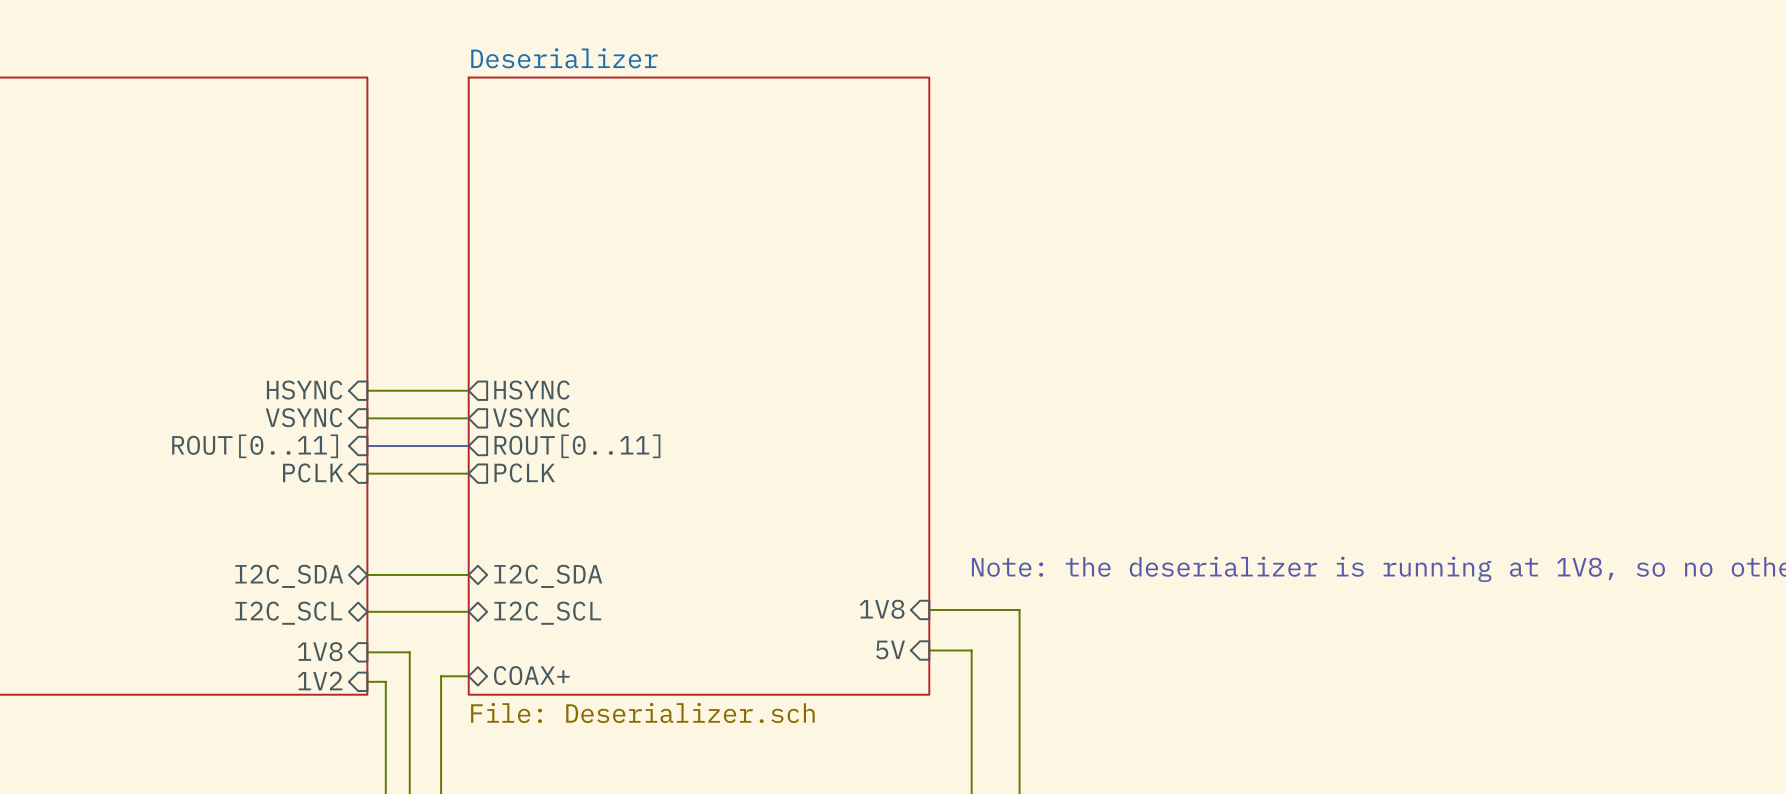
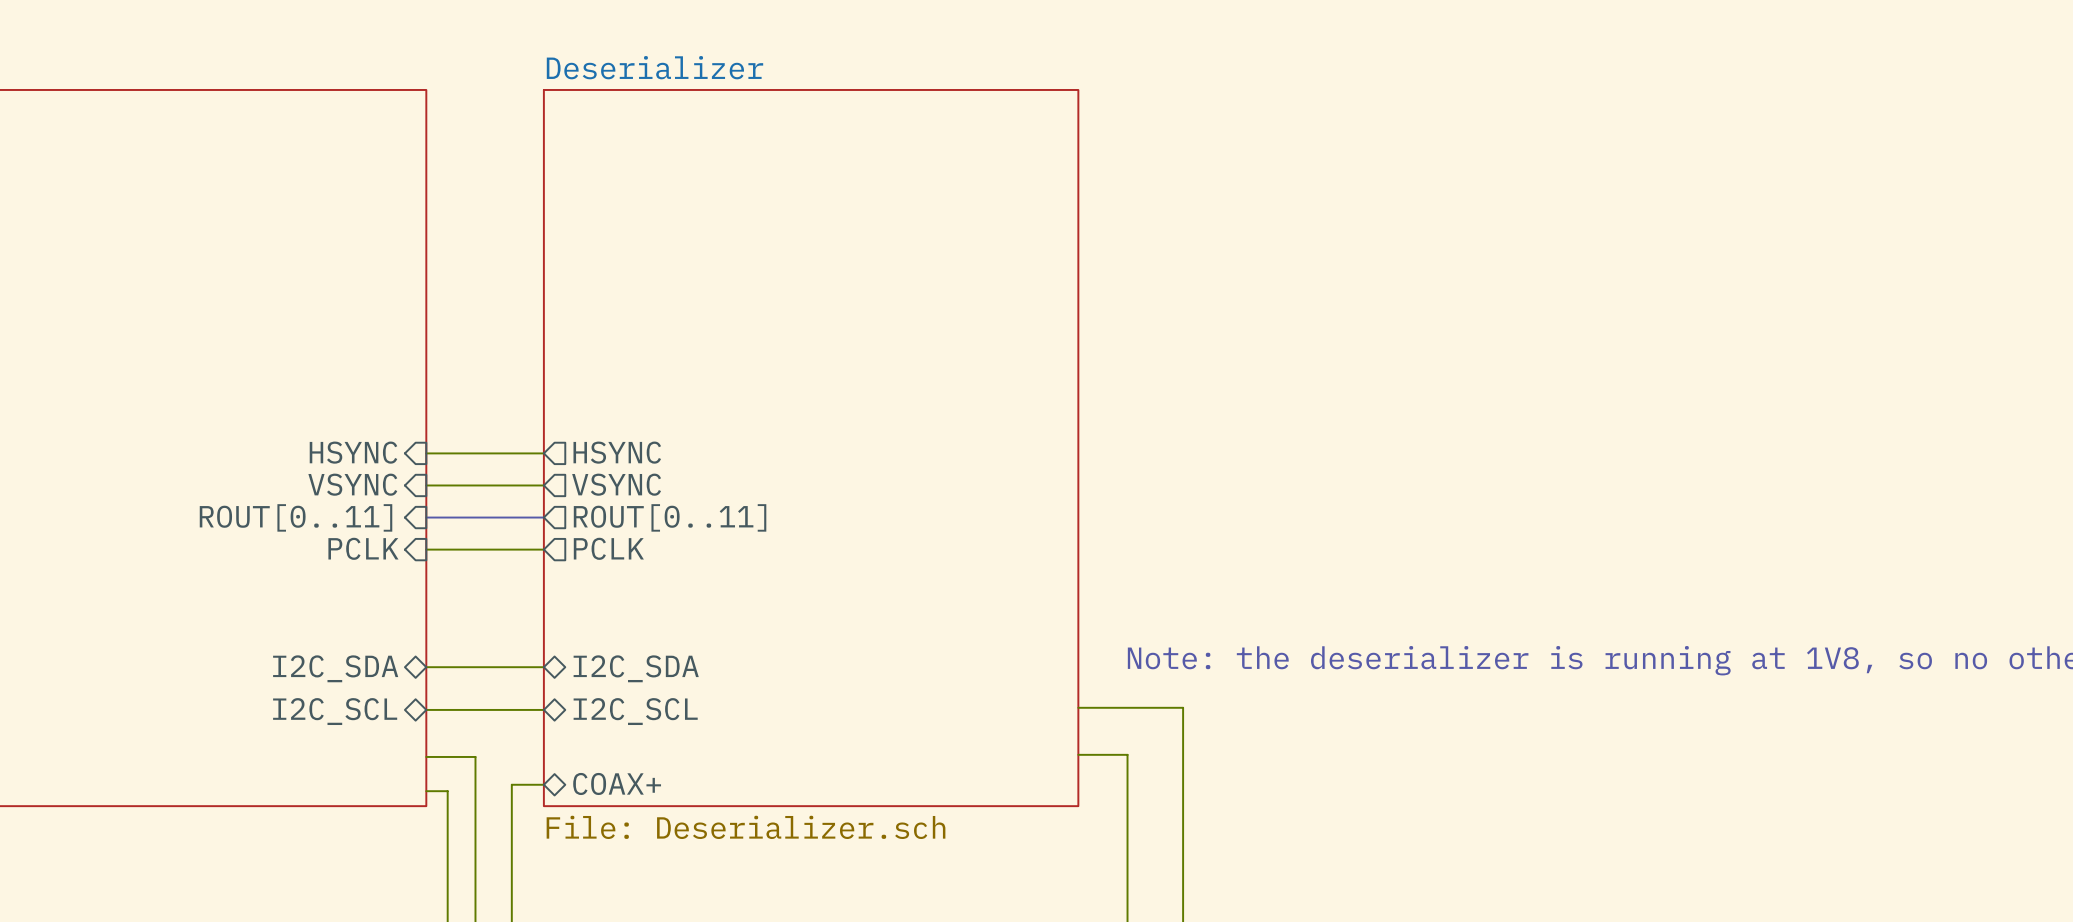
sheet pin: 1V8 (882, 609) -> none
sheet pin: 5V (890, 649) -> none
sheet pin: 1V8 (320, 651) -> none
sheet pin: 1V2 (320, 680) -> none

